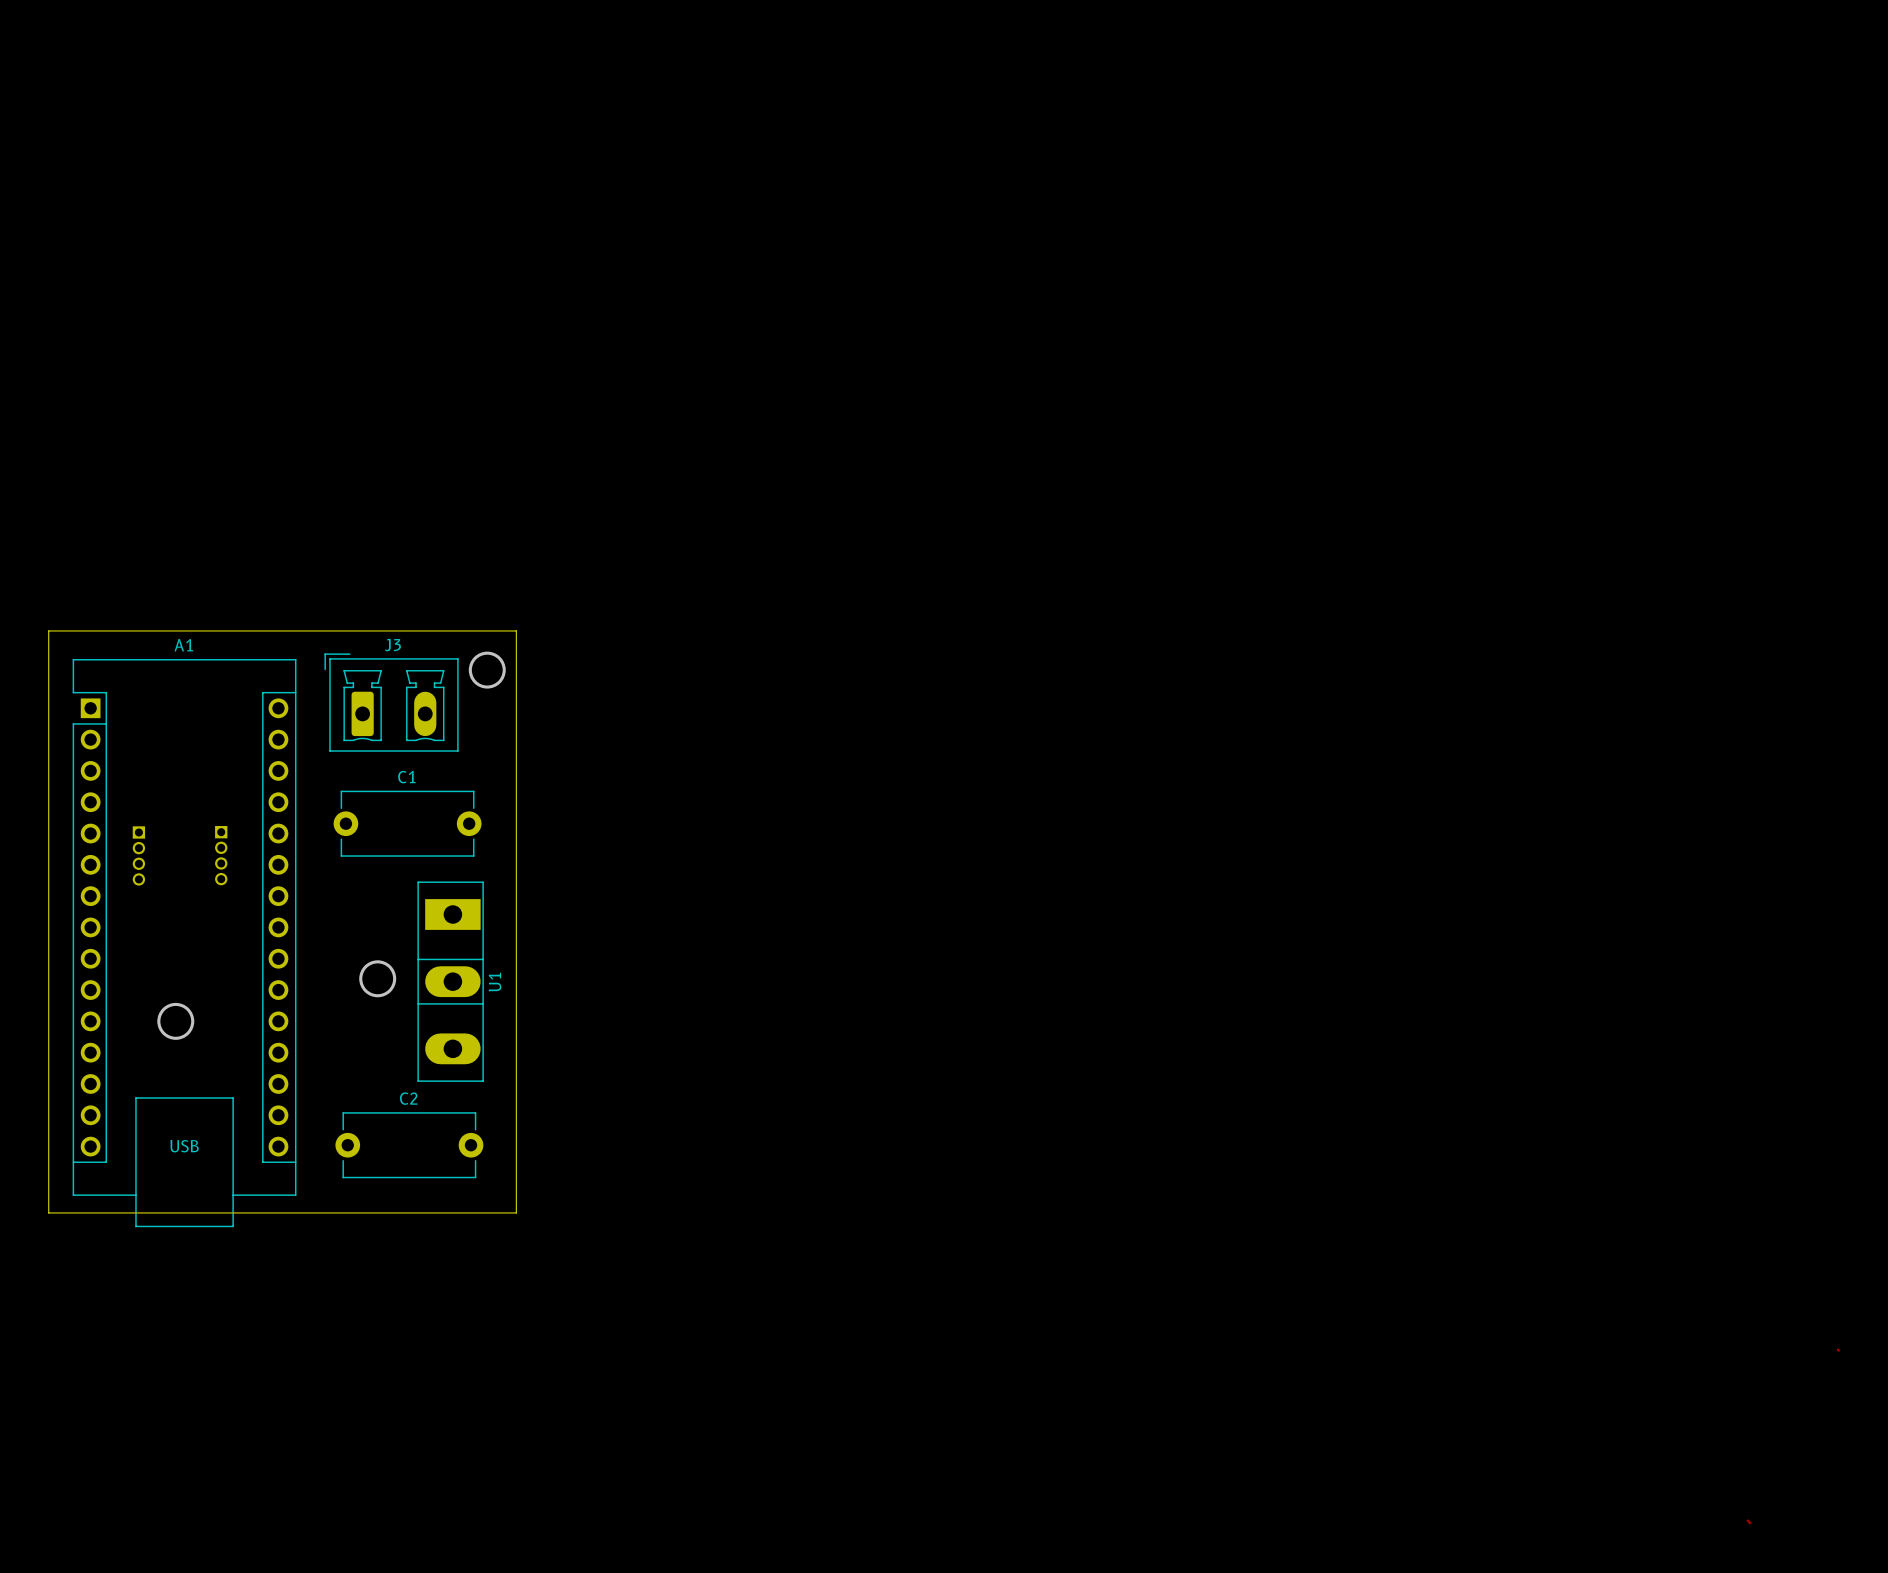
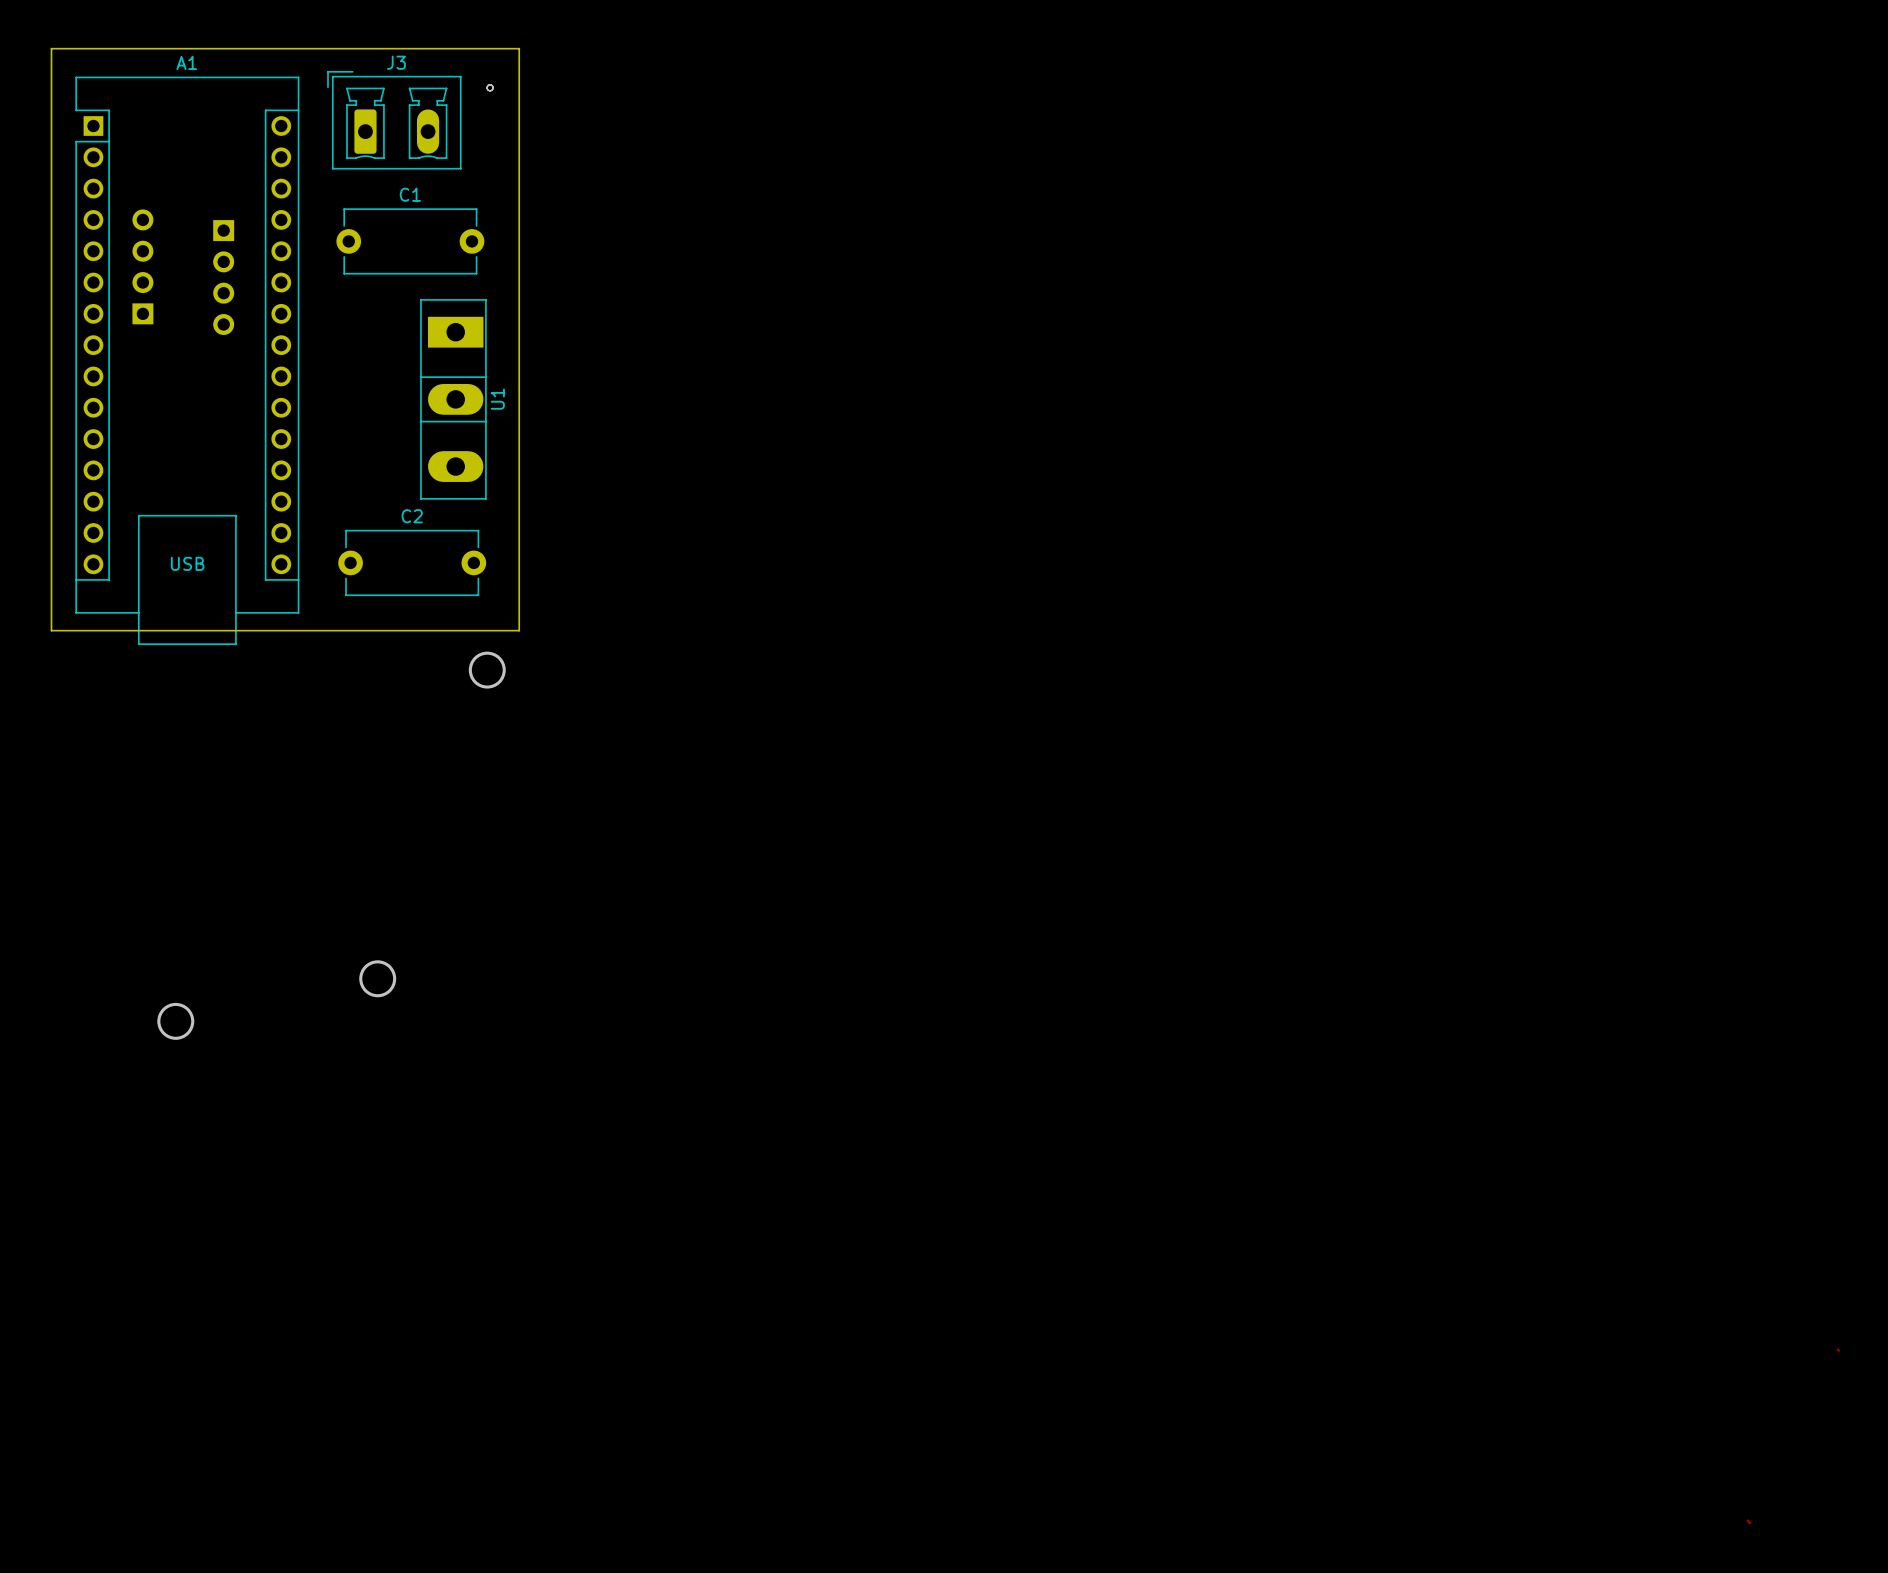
board edge: none -> (51, 48) (519, 48) (519, 630) (51, 630) (51, 48)
via: none -> (490, 87)
part: none -> (142, 266)
part: none -> (223, 277)
board edge: (48, 630) (516, 630) (516, 1212) (48, 1212) (48, 630) -> none
J3 position: (391, 702) -> (394, 120)
C1 position: (407, 823) -> (410, 241)
part: (138, 855) -> none
part: (221, 855) -> none
A1 position: (184, 943) -> (187, 360)
U1 position: (450, 981) -> (453, 399)
C2 position: (409, 1145) -> (412, 562)

